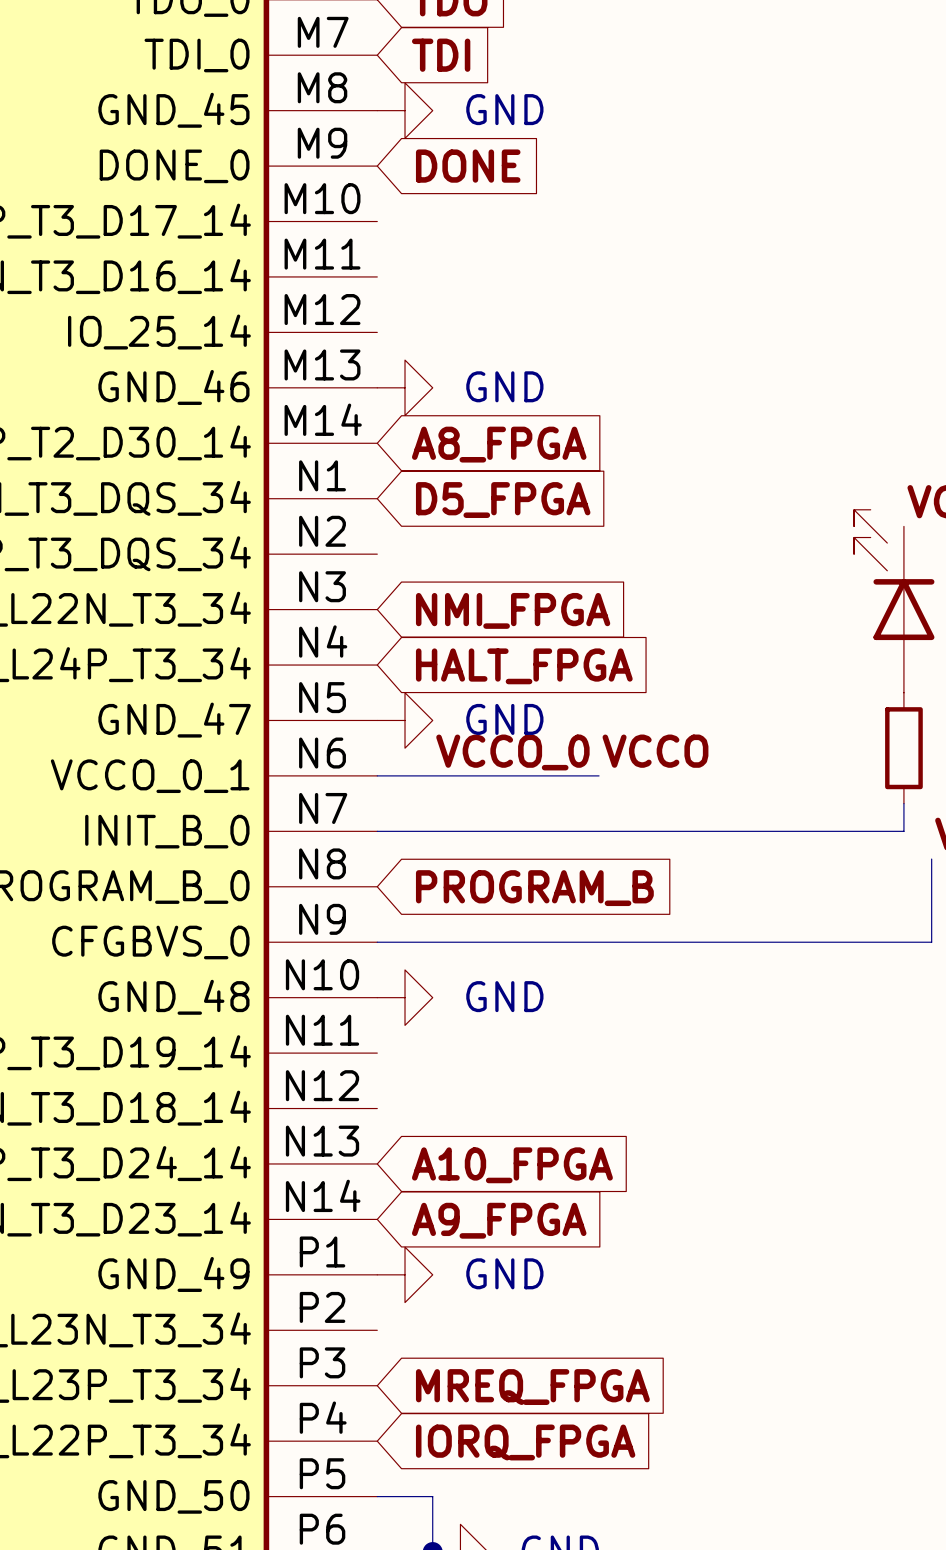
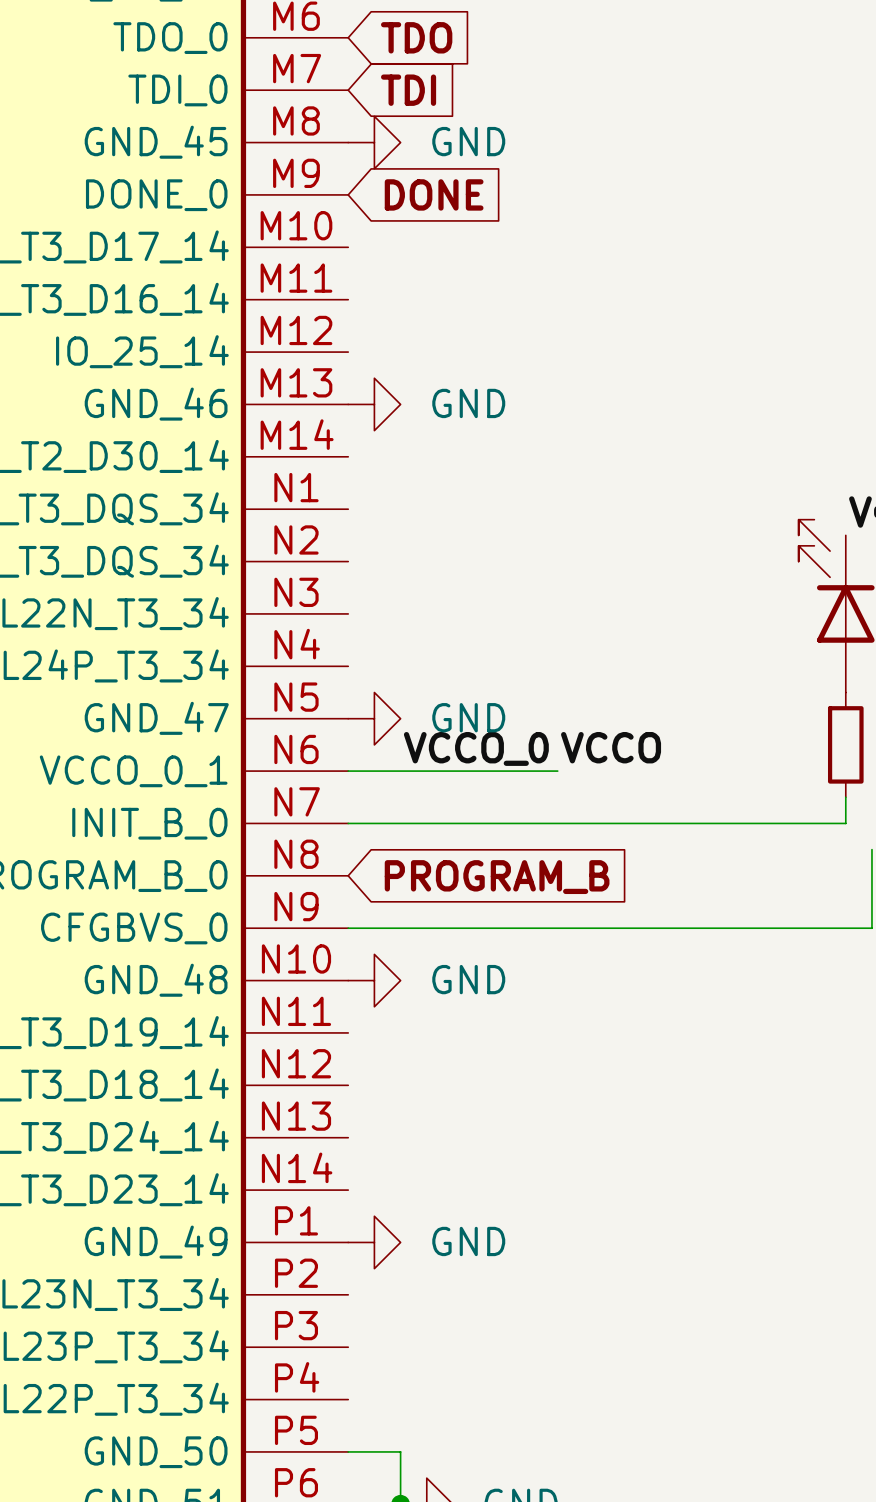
global label: A8_FPGA (499, 444) -> none
global label: D5_FPGA (503, 500) -> none
global label: NMI_FPGA (513, 610) -> none
global label: HALT_FPGA (524, 666) -> none
global label: A10_FPGA (512, 1165) -> none
global label: A9_FPGA (499, 1220) -> none
global label: MREQ_FPGA (532, 1387) -> none
global label: IORQ_FPGA (525, 1442) -> none

